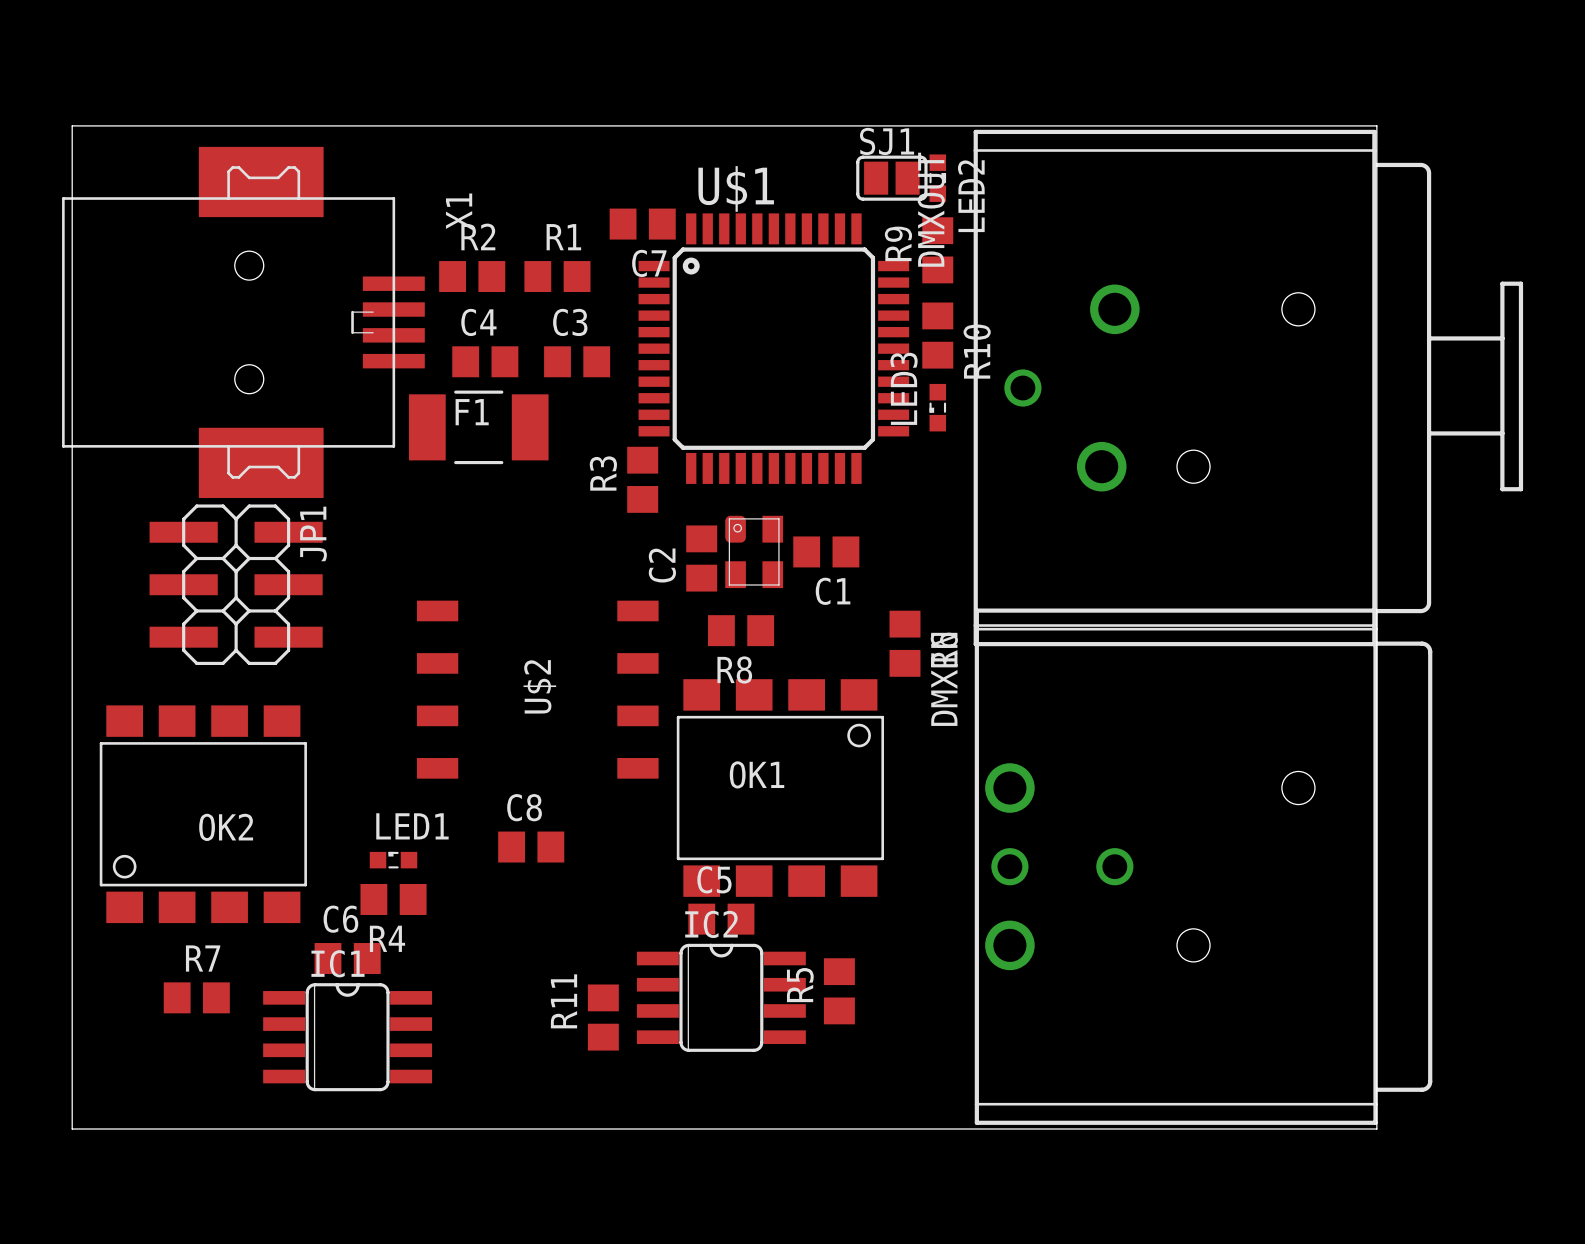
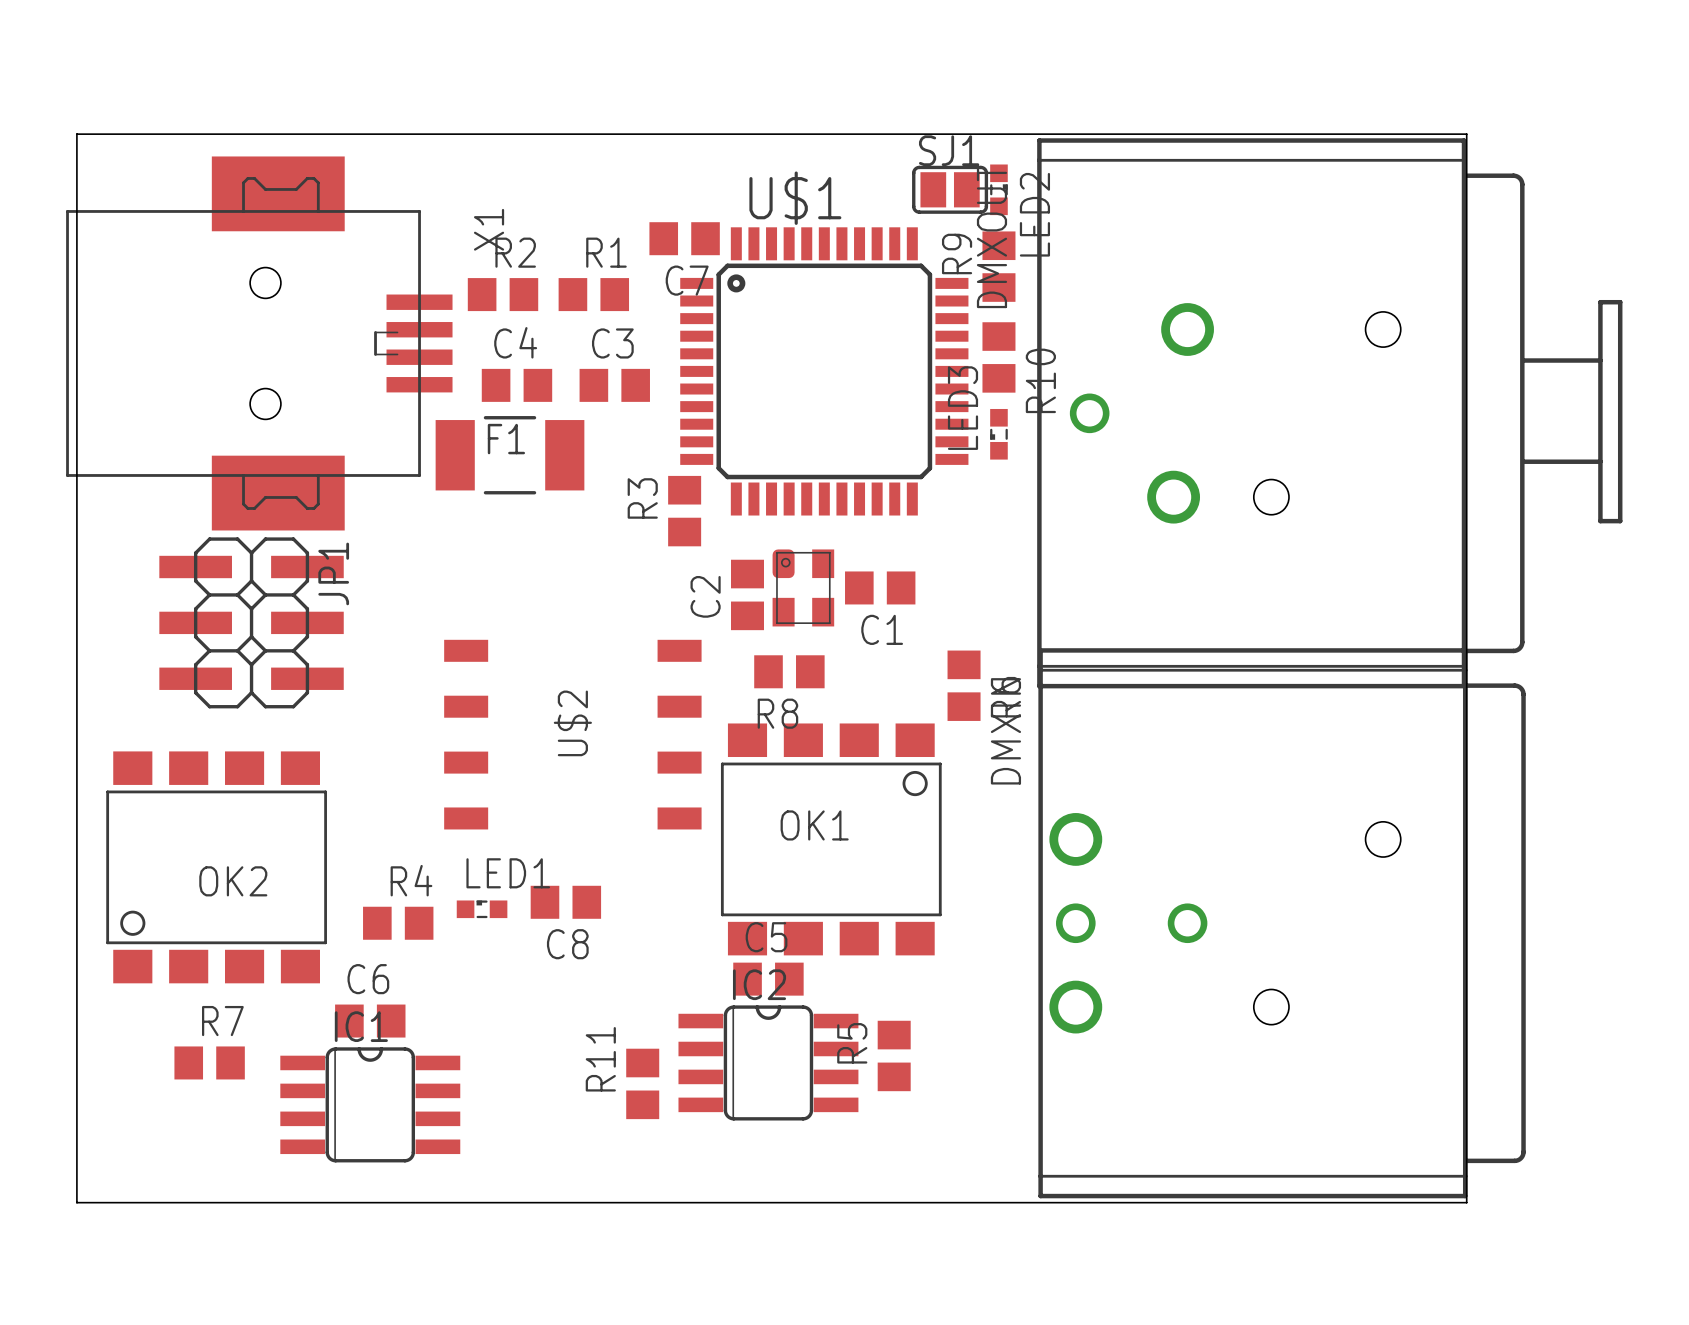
C8 name position: C8 (524, 807) -> C8 (567, 944)
LED1 position: (393, 860) -> (482, 909)
R4 position: (393, 899) -> (398, 923)
R4 name position: R4 (387, 938) -> R4 (411, 880)

